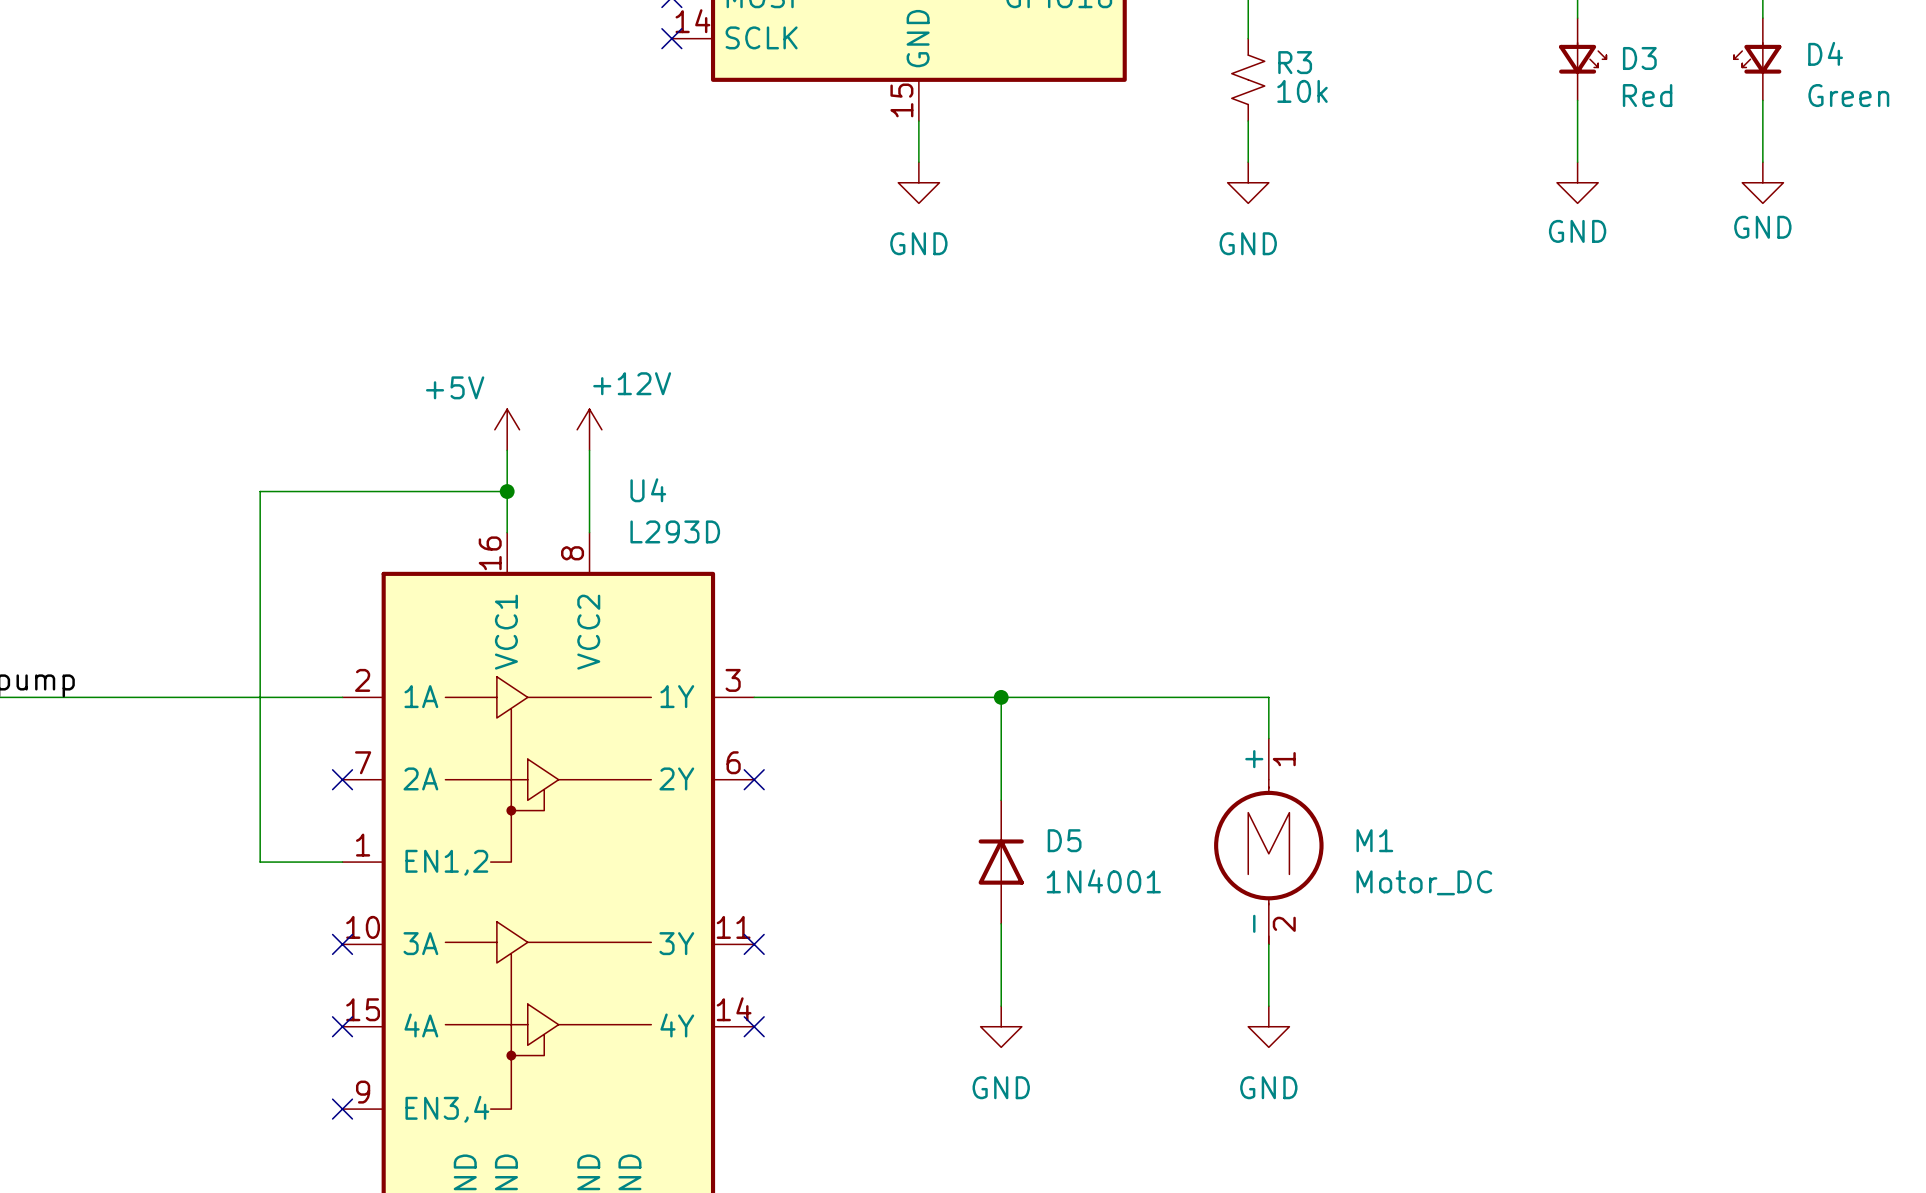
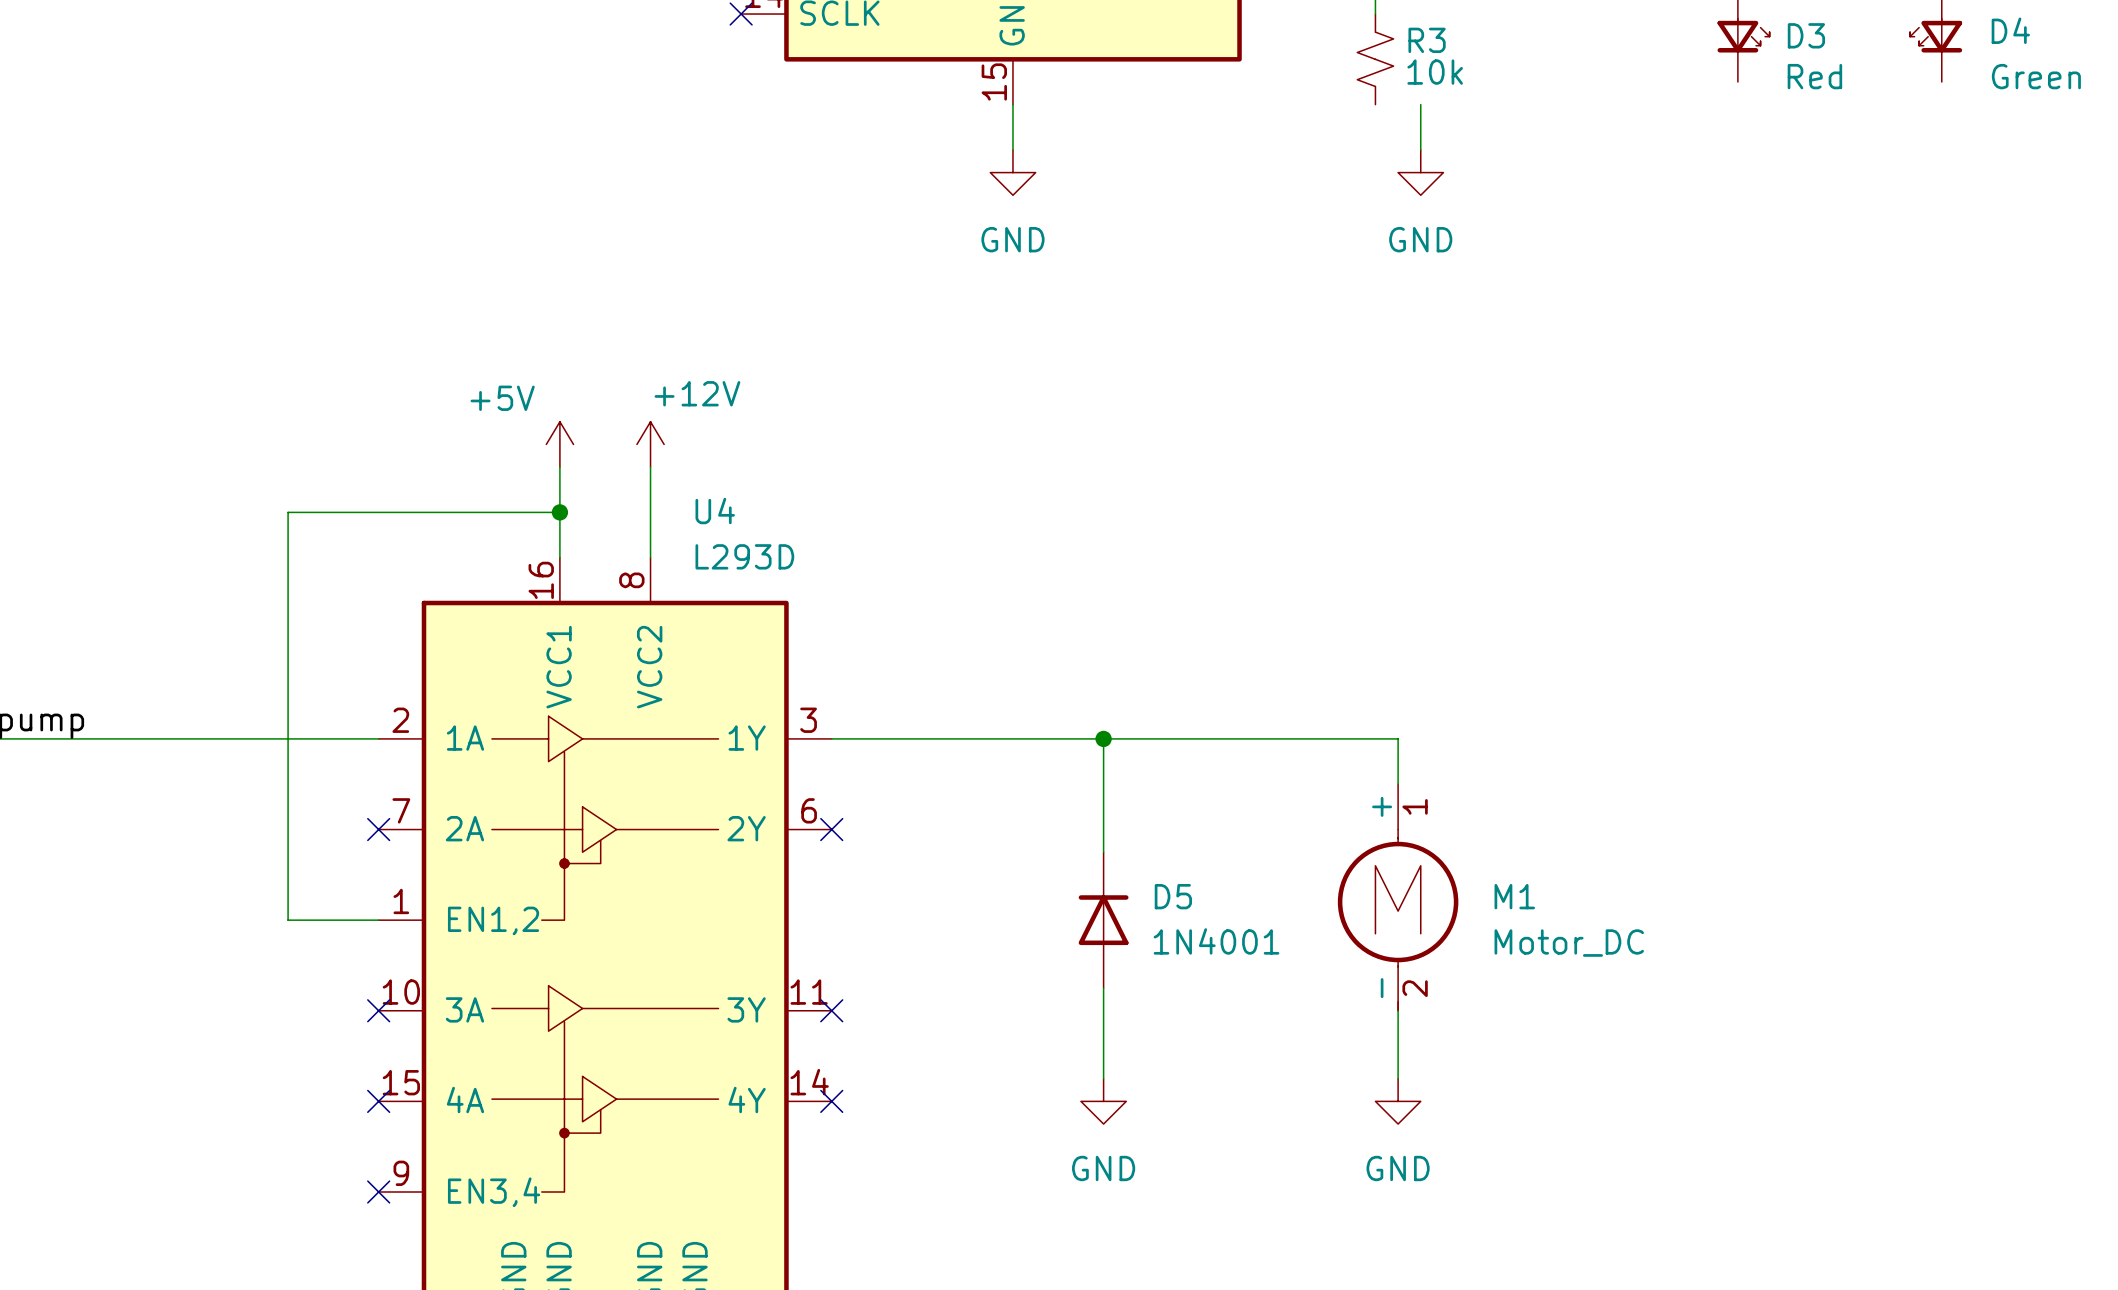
wire: (1577, 100) (1577, 162) -> none
wire: (1762, 100) (1762, 162) -> none
wire: (1248, 121) (1248, 162) -> (1420, 104) (1420, 149)
power symbol position: GND (1248, 182) -> GND (1420, 172)
power symbol: GND (1577, 182) -> none
power symbol: GND (1762, 182) -> none

